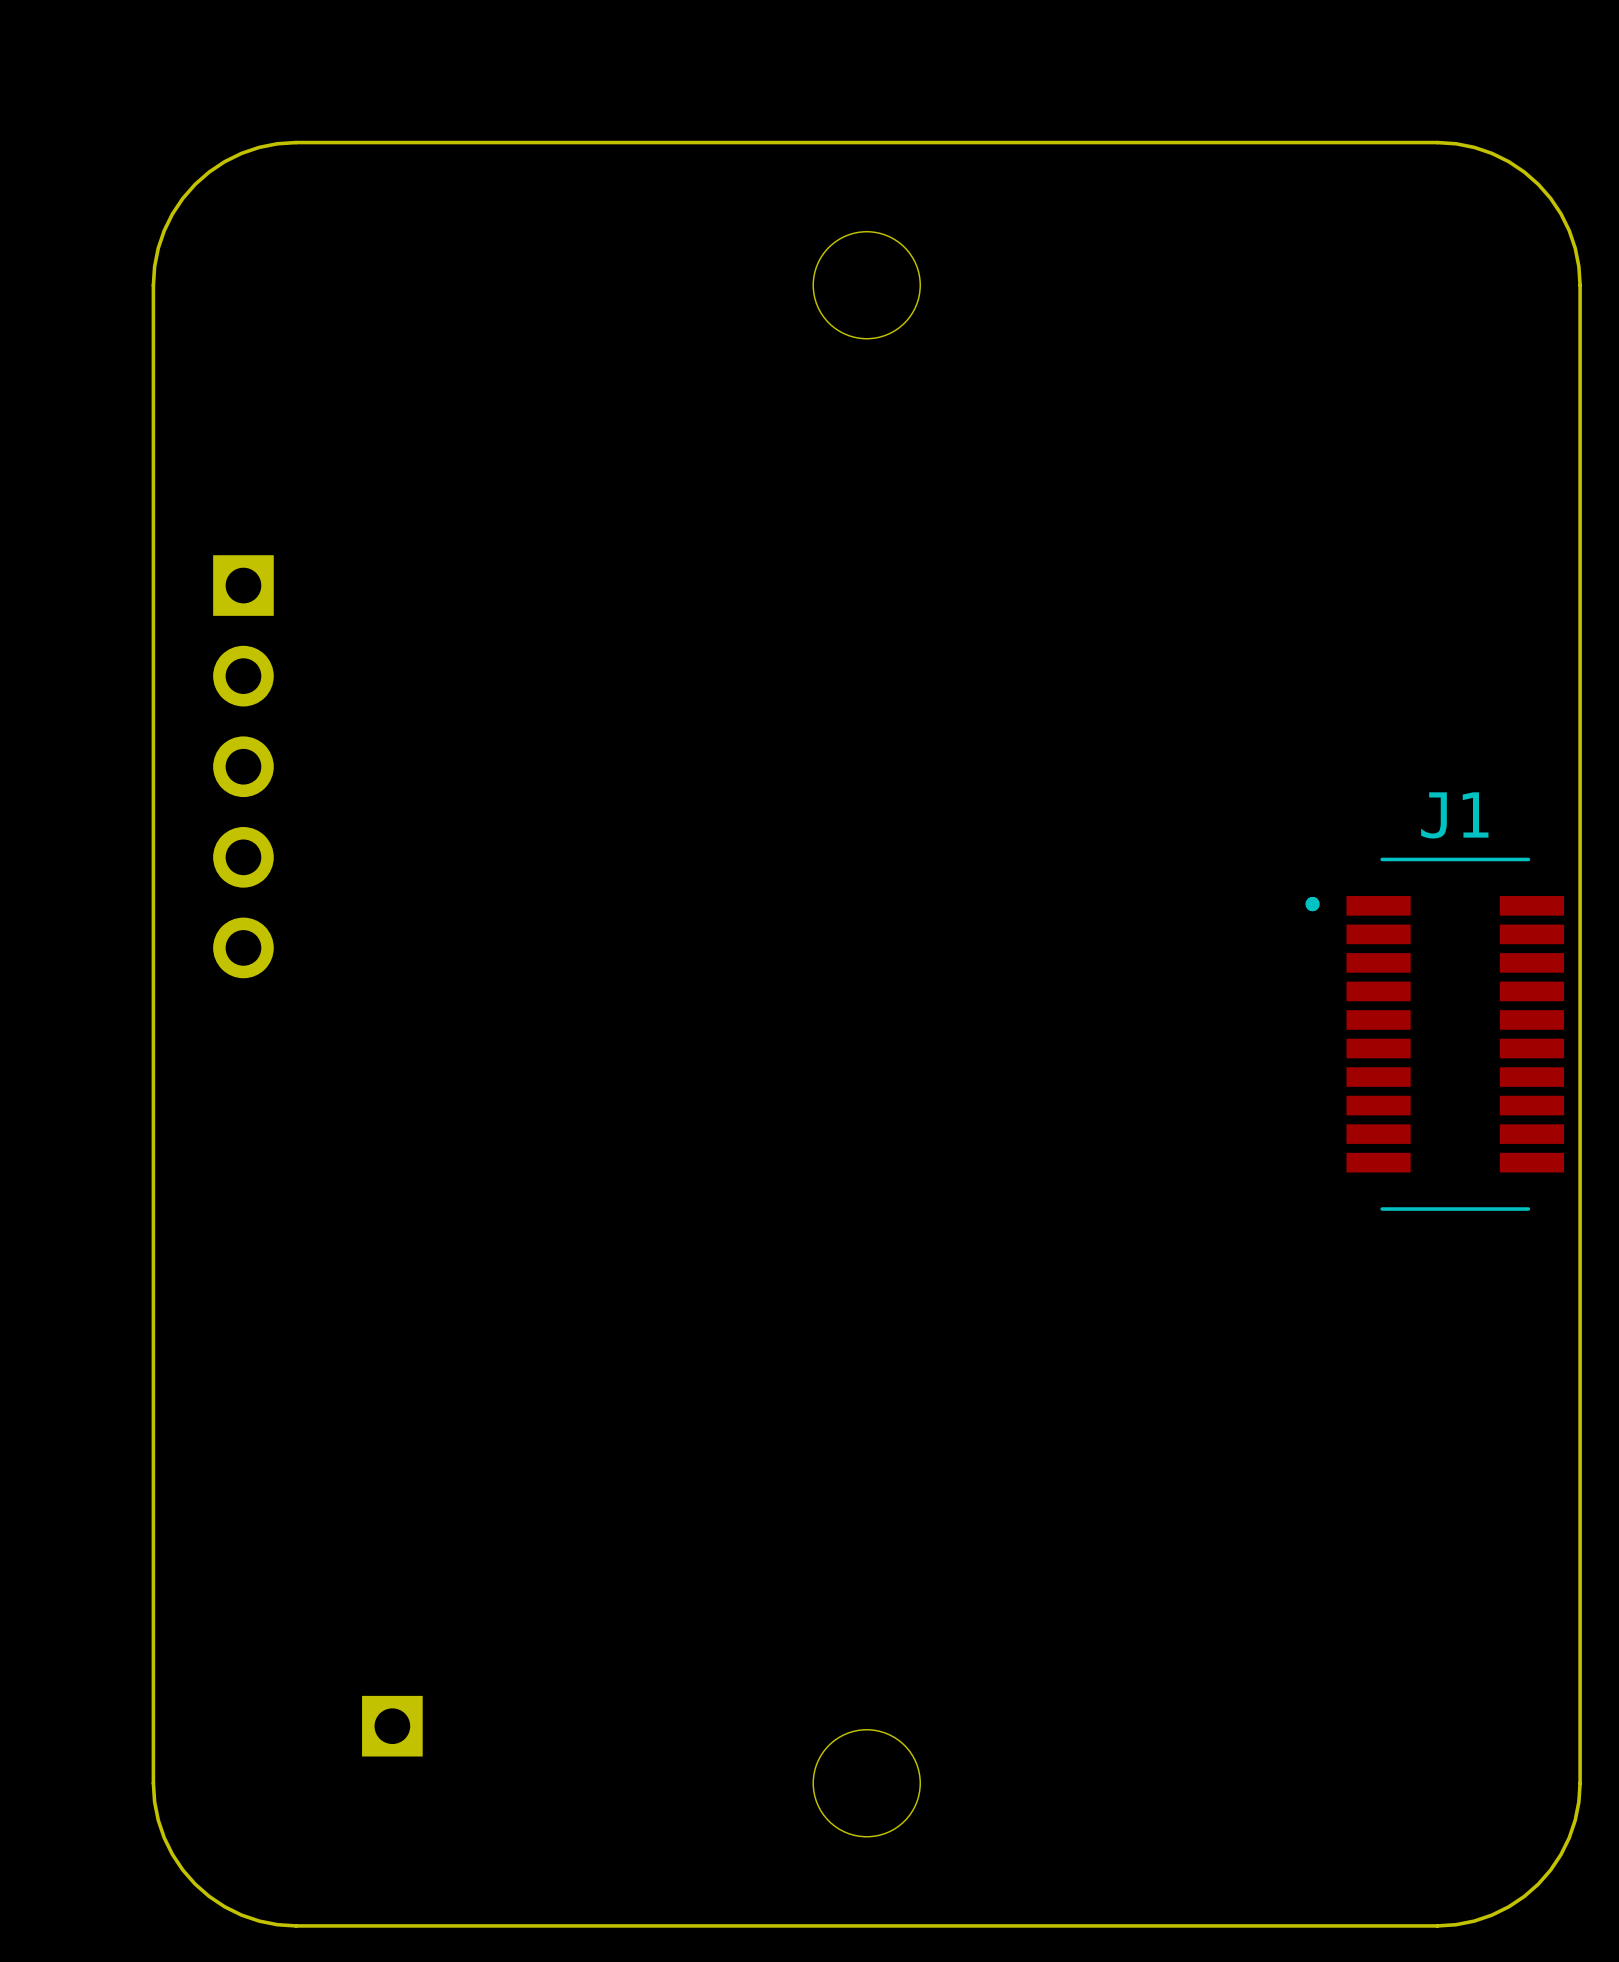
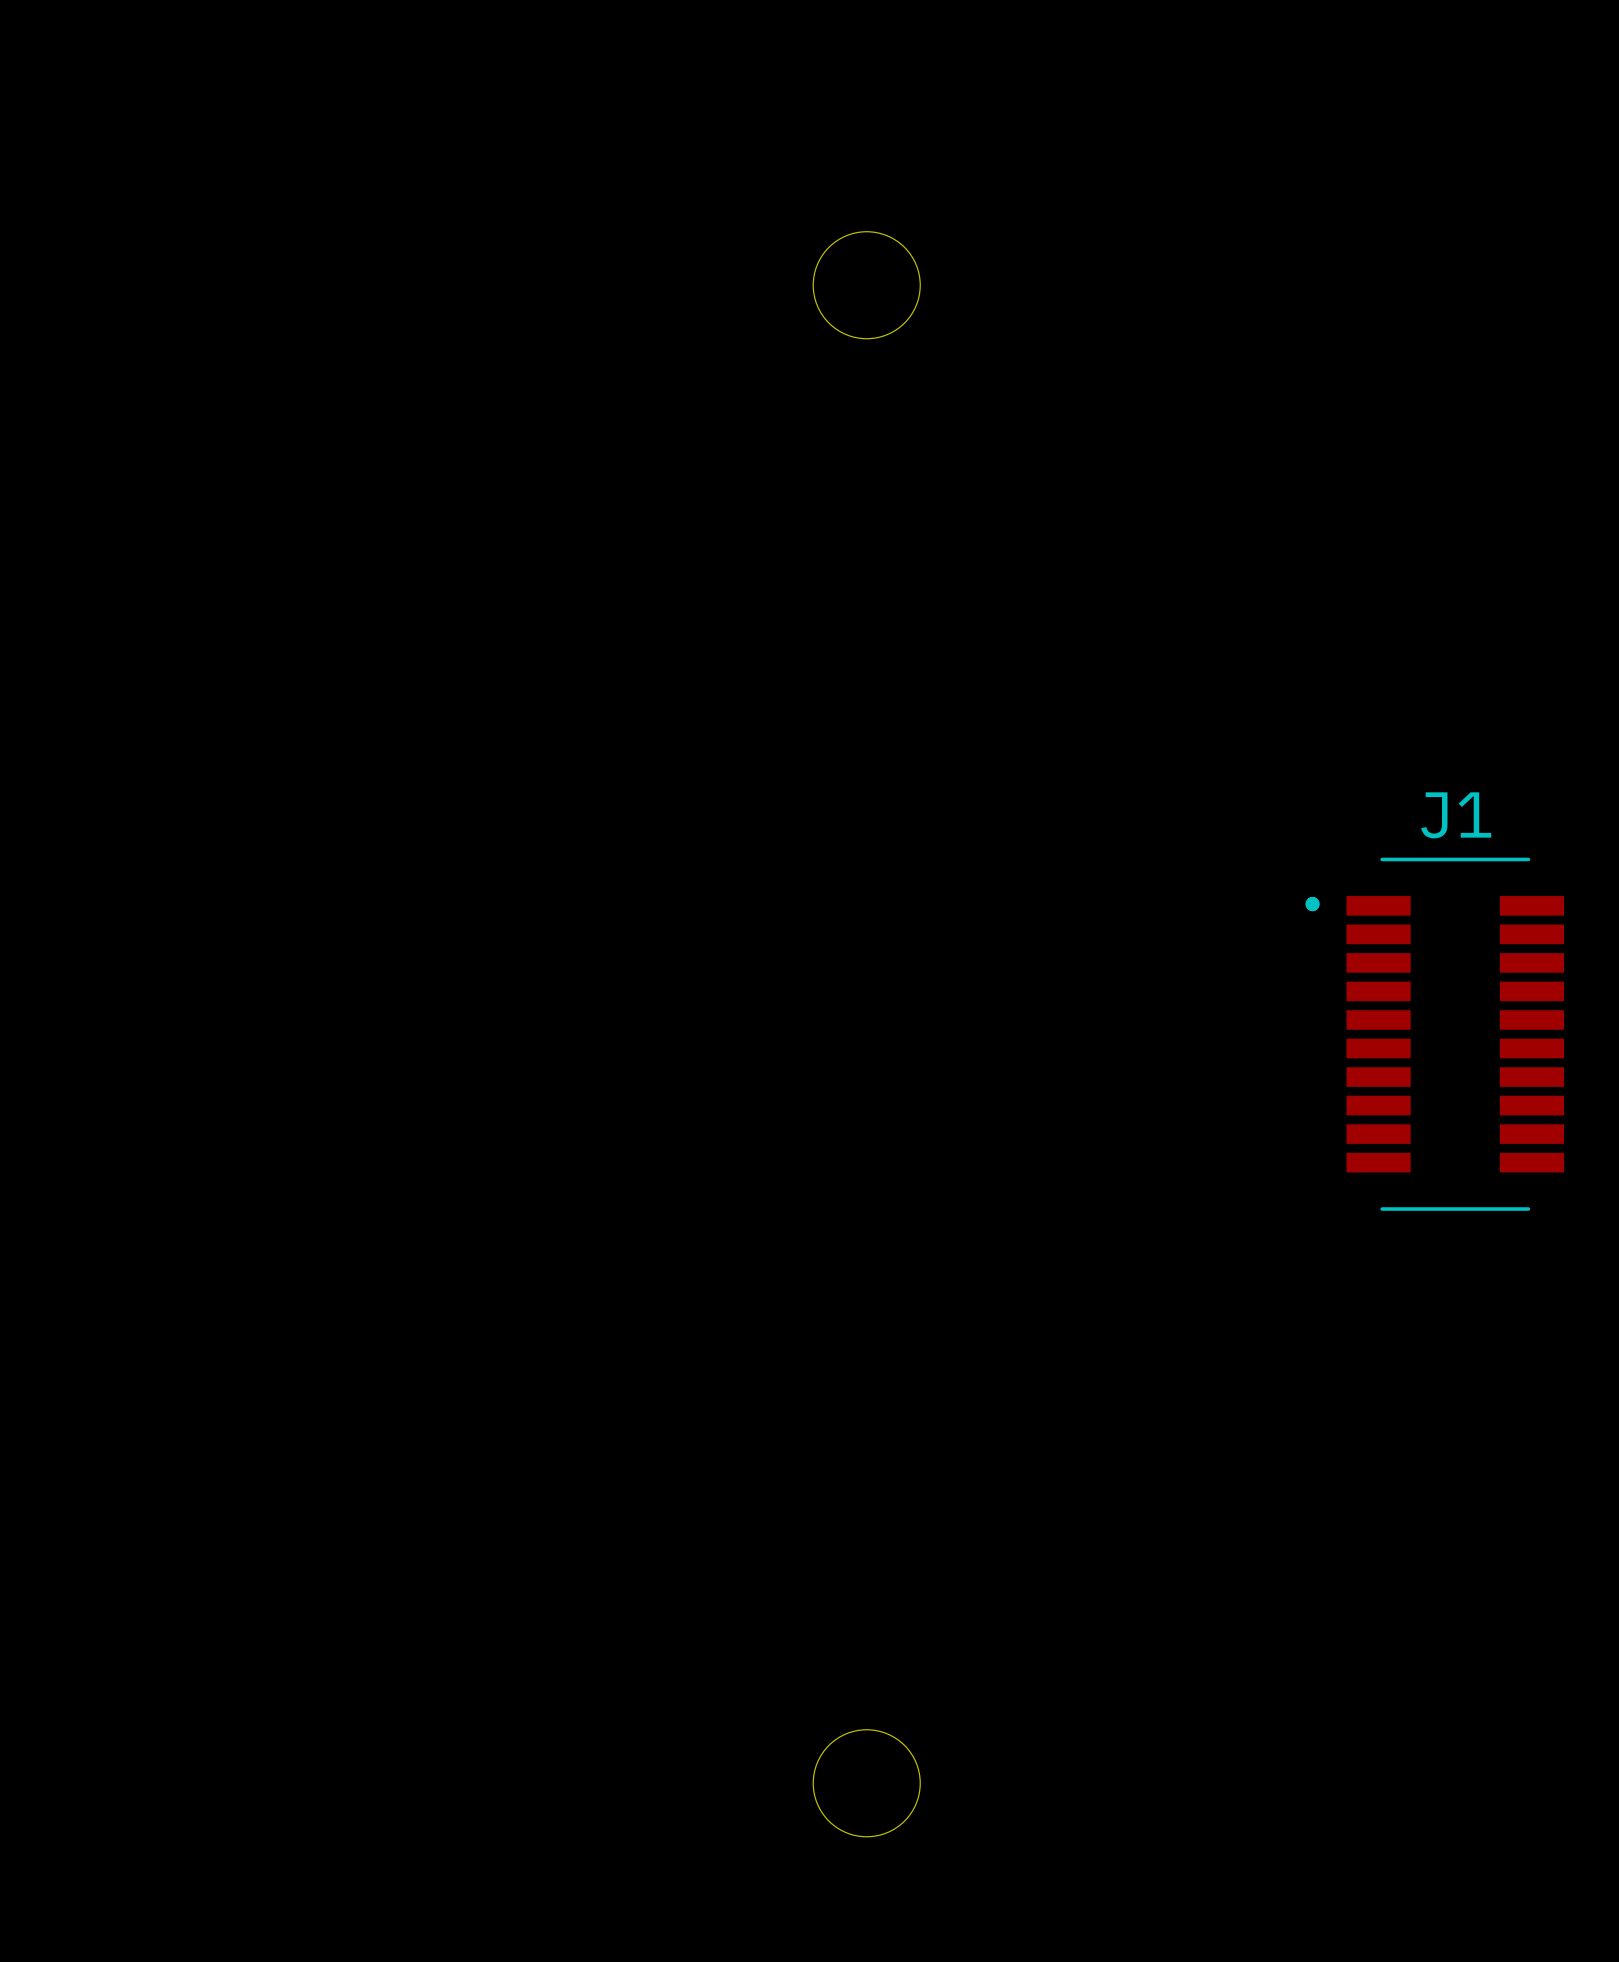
board edge: (296, 142) (1437, 142) (1474, 147) (1508, 161) (1538, 184) (1550, 198) (1569, 230) (1575, 248) (1580, 285) (1580, 1783) (1575, 1820) (1560, 1854) (1538, 1884) (1524, 1896) (1492, 1915) (1474, 1921) (1437, 1925) (296, 1925) (259, 1921) (224, 1906) (209, 1896) (182, 1870) (172, 1854) (158, 1820) (153, 1783) (153, 285) (154, 266) (164, 230) (182, 198) (195, 184) (224, 161) (241, 153) (259, 147) (296, 142) -> none
part: (243, 766) -> none
part: (392, 1726) -> none

